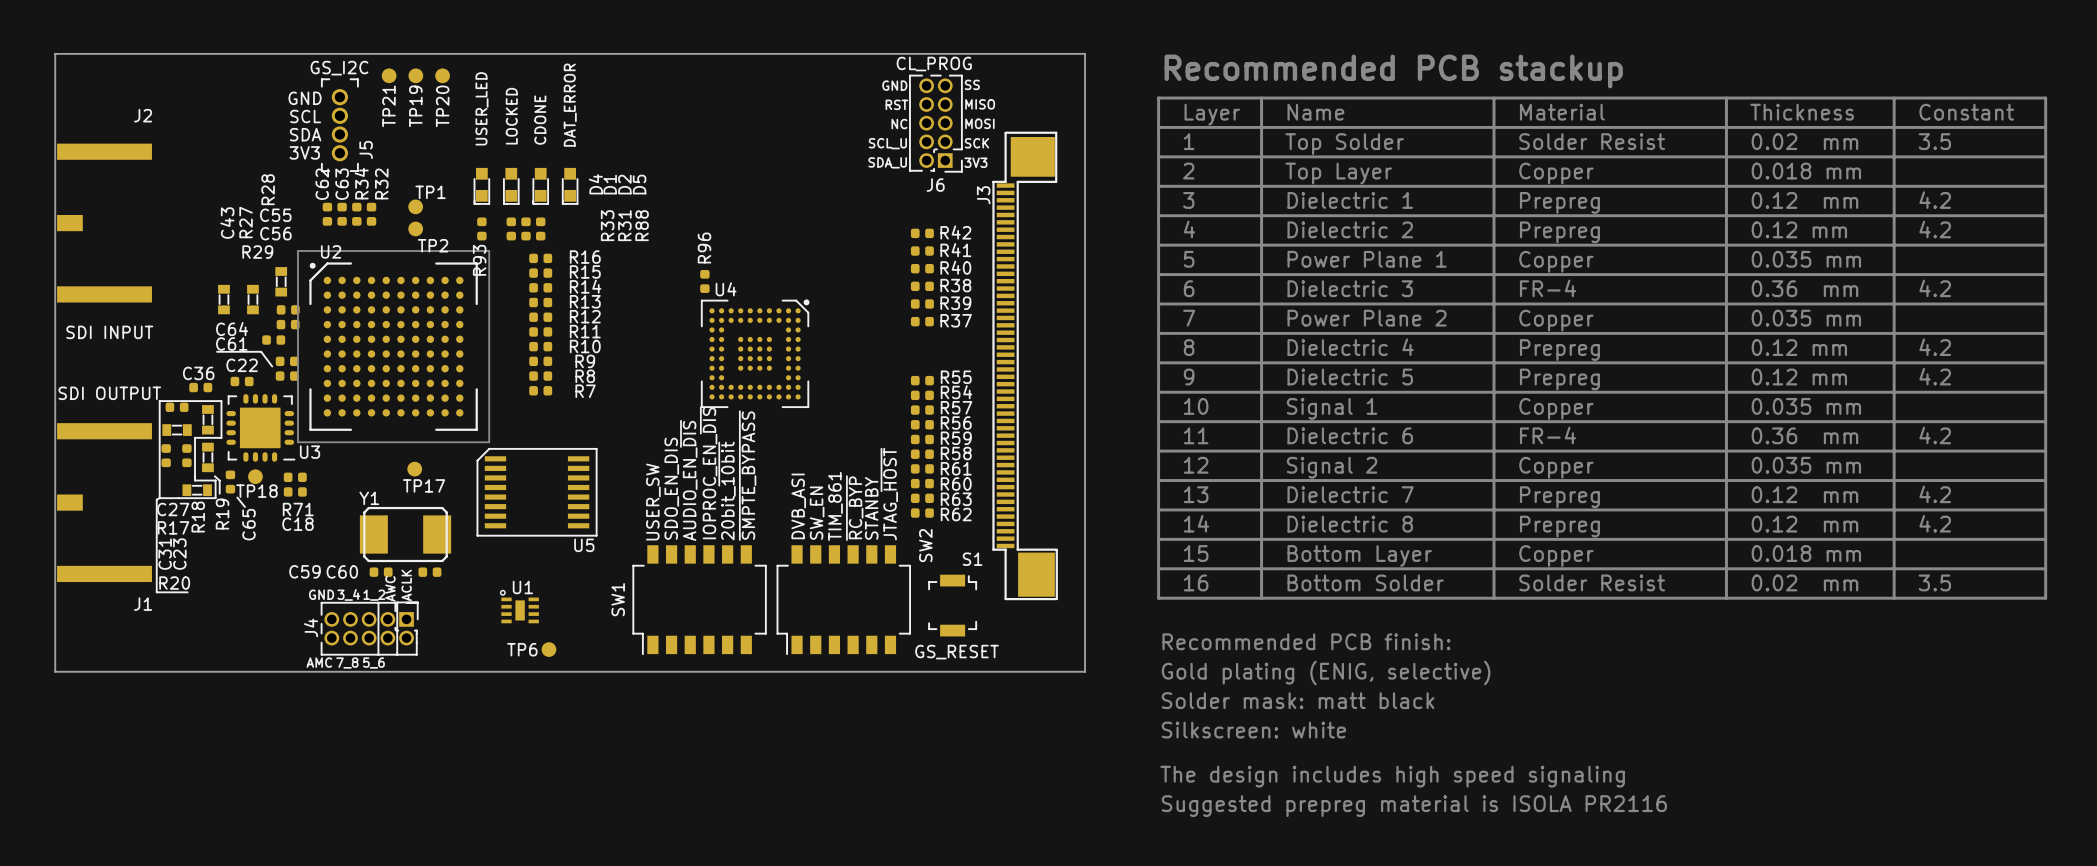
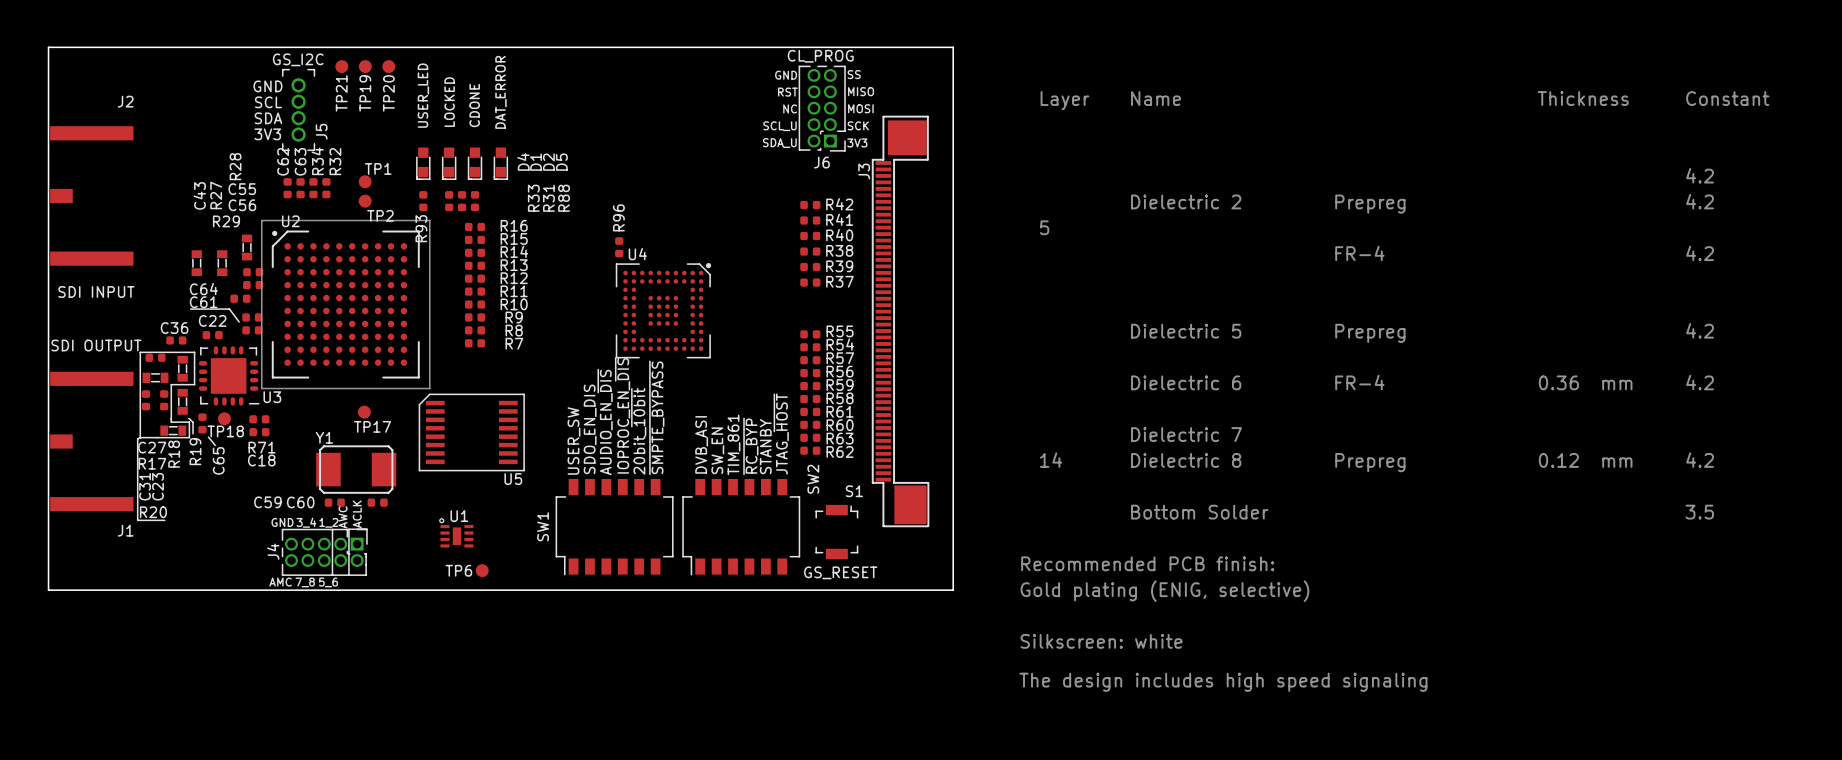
text: Recommended PCB stackup (1393, 71) -> none
line: (1158, 98) (1158, 598) (2045, 598) (2045, 98) (1158, 98) -> none
line: (1261, 98) (1261, 598) -> none
line: (1494, 98) (1494, 598) -> none
line: (1726, 98) (1726, 598) -> none
line: (1894, 98) (1894, 598) -> none
text: Material (1562, 112) -> none
line: (1158, 127) (2045, 127) -> none
text: 1 (1189, 141) -> none
text: Solder Resist (1592, 141) -> none
text: 0.02 mm (1804, 141) -> none
text: 3.5 (1934, 141) -> none
text: Top Solder (1344, 144) -> none
line: (1158, 156) (2045, 156) -> none
text: 2 (1188, 171) -> none
text: 0.018 mm (1806, 171) -> none
text: Top Layer (1338, 173) -> none
text: Copper (1556, 173) -> none
line: (1158, 186) (2045, 186) -> none
text: 3 (1188, 200) -> none
text: Dielectric 1 (1350, 200) -> none
text: 0.12 mm (1804, 200) -> none
text: Prepreg (1559, 202) -> none
line: (1158, 215) (2045, 215) -> none
text: 4 (1189, 229) -> none
text: 0.12 mm (1799, 229) -> none
line: (1158, 245) (2045, 245) -> none
text: Power Plane 1 (1367, 259) -> none
text: 0.035 mm (1806, 259) -> none
text: Copper (1556, 261) -> none
line: (1158, 274) (2045, 274) -> none
text: 6 (1189, 288) -> none
text: Dielectric 3 (1350, 288) -> none
text: 0.36 mm (1804, 288) -> none
line: (1158, 303) (2045, 303) -> none
text: 7 (1189, 318) -> none
text: Power Plane 2 (1367, 318) -> none
text: 0.035 mm (1806, 318) -> none
text: Copper (1556, 320) -> none
line: (1158, 333) (2045, 333) -> none
text: 8 (1189, 347) -> none
text: Dielectric 4 (1350, 347) -> none
text: 0.12 mm (1799, 347) -> none
text: 4.2 (1935, 347) -> none
text: Prepreg (1559, 350) -> none
line: (1158, 362) (2045, 362) -> none
text: 9 (1189, 376) -> none
text: 0.12 mm (1799, 376) -> none
line: (1158, 392) (2045, 392) -> none
text: 10 (1196, 406) -> none
text: 0.035 mm (1806, 406) -> none
text: Signal 1 (1332, 408) -> none
text: Copper (1556, 408) -> none
line: (1158, 421) (2045, 421) -> none
text: 11 (1196, 435) -> none
line: (1158, 451) (2045, 451) -> none
text: 12 (1196, 465) -> none
text: 0.035 mm (1806, 465) -> none
text: Signal 2 (1332, 467) -> none
text: Copper (1556, 467) -> none
line: (1158, 480) (2045, 480) -> none
text: 13 (1196, 494) -> none
text: 0.12 mm (1804, 494) -> none
text: 4.2 (1935, 494) -> none
text: Prepreg (1559, 497) -> none
line: (1158, 509) (2045, 509) -> none
line: (1158, 539) (2045, 539) -> none
text: 15 (1196, 553) -> none
text: 0.018 mm (1806, 553) -> none
text: Bottom Layer (1359, 555) -> none
text: Copper (1556, 555) -> none
line: (1158, 568) (2045, 568) -> none
text: 16 (1196, 582) -> none
text: Solder Resist (1592, 582) -> none
text: 0.02 mm (1804, 582) -> none
text: Solder mask: matt black (1298, 700) -> none
text: Suggested prepreg material is ISOLA PR2116 (1414, 806) -> none

